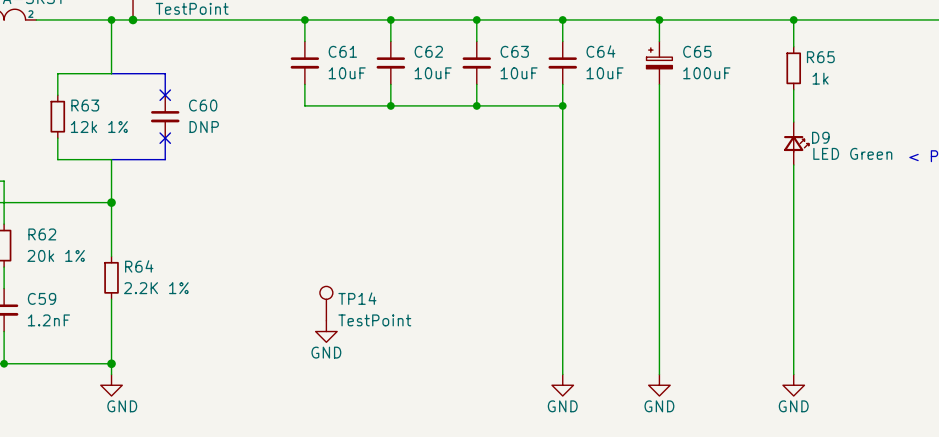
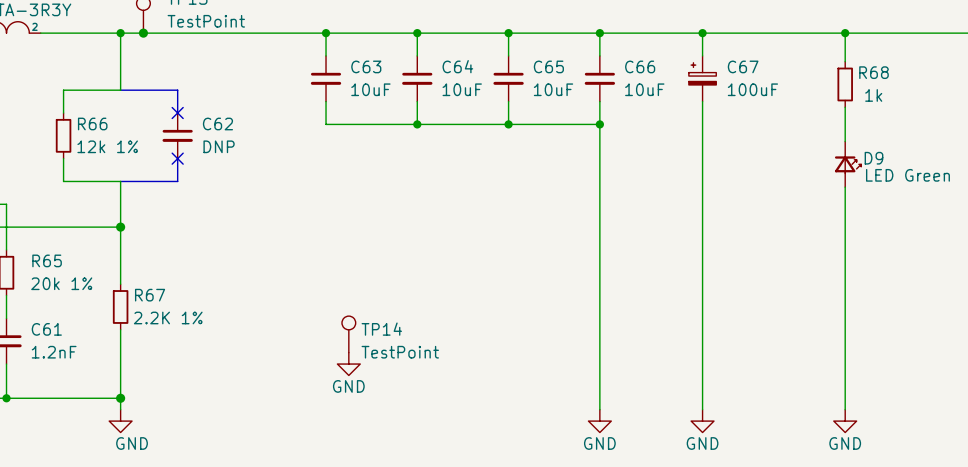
C61 name: C61 (342, 51) -> C63 (366, 66)
C62 name: C62 (428, 51) -> C64 (457, 66)
C63 name: C63 (514, 51) -> C65 (548, 66)
C64 name: C64 (600, 51) -> C66 (640, 66)
C65 name: C65 (697, 51) -> C67 (743, 66)
R65 name: R65 (820, 57) -> R68 (874, 72)
R63 name: R63 (85, 105) -> R66 (92, 123)
C60 name: C60 (203, 105) -> C62 (217, 123)
R62 name: R62 (42, 234) -> R65 (47, 260)
R64 name: R64 (139, 266) -> R67 (150, 295)
C59 name: C59 (42, 298) -> C61 (46, 329)

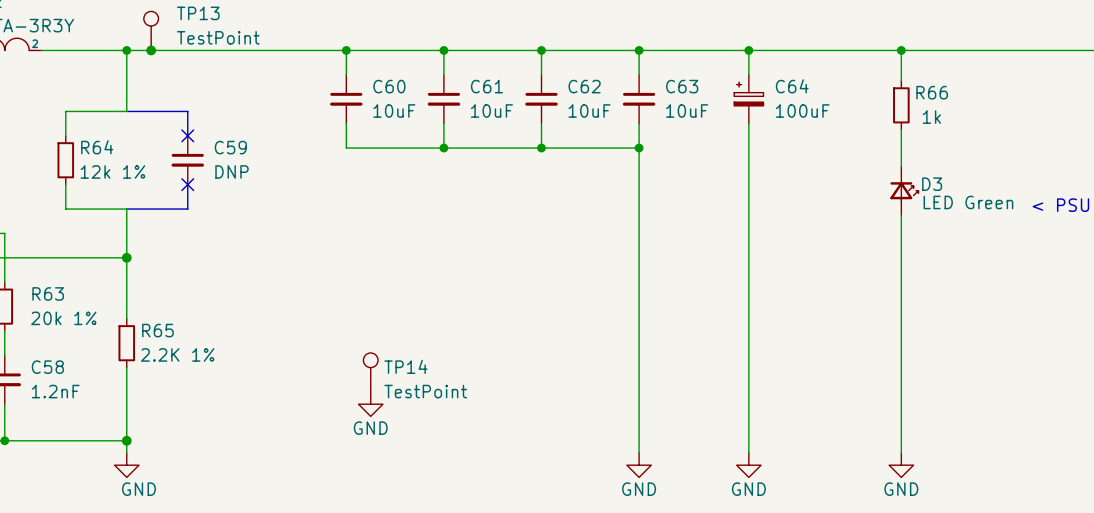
C63 name: C63 (366, 66) -> C60 (389, 86)
C64 name: C64 (457, 66) -> C61 (486, 86)
C65 name: C65 (548, 66) -> C62 (584, 86)
C66 name: C66 (640, 66) -> C63 (682, 86)
C67 name: C67 (743, 66) -> C64 (792, 86)
R68 name: R68 (874, 72) -> R66 (932, 92)
R66 name: R66 (92, 123) -> R64 (97, 147)
C62 name: C62 (217, 123) -> C59 (230, 147)
D9 name: D9 (874, 158) -> D3 (932, 184)
R65 name: R65 (47, 260) -> R63 (48, 293)
R67 name: R67 (150, 295) -> R65 (157, 330)
C61 name: C61 (46, 329) -> C58 (47, 367)

